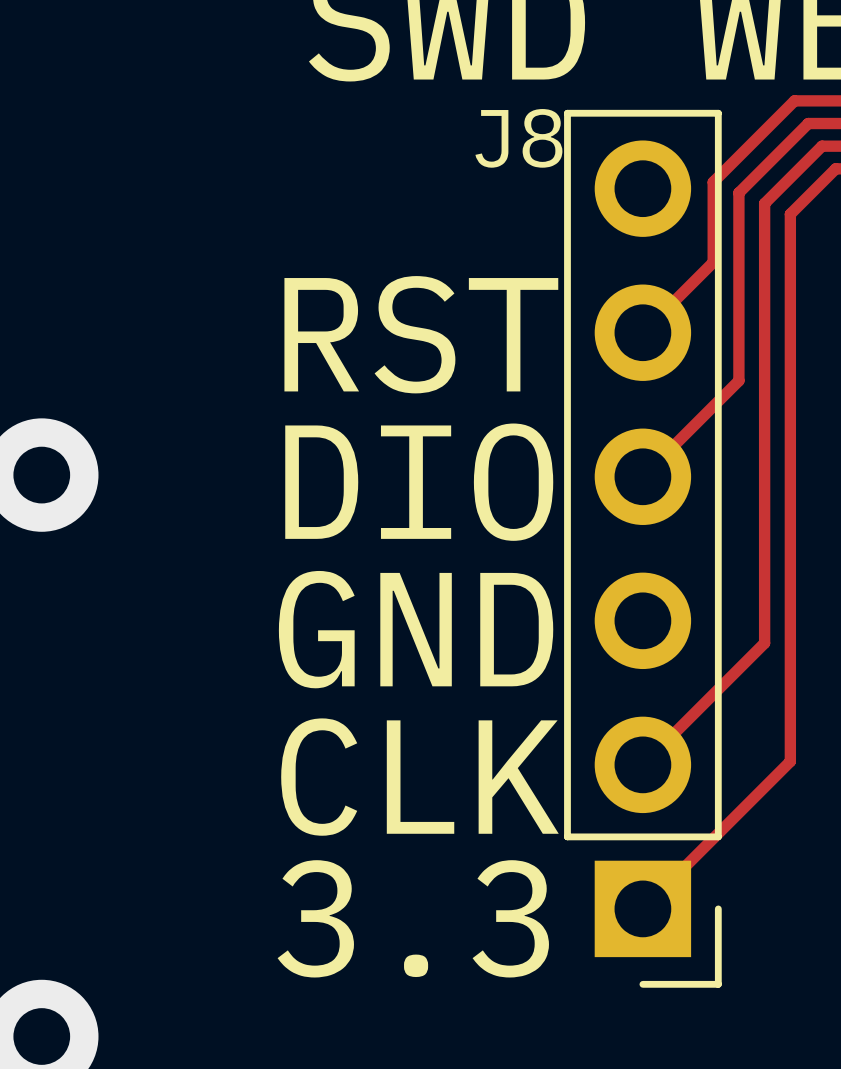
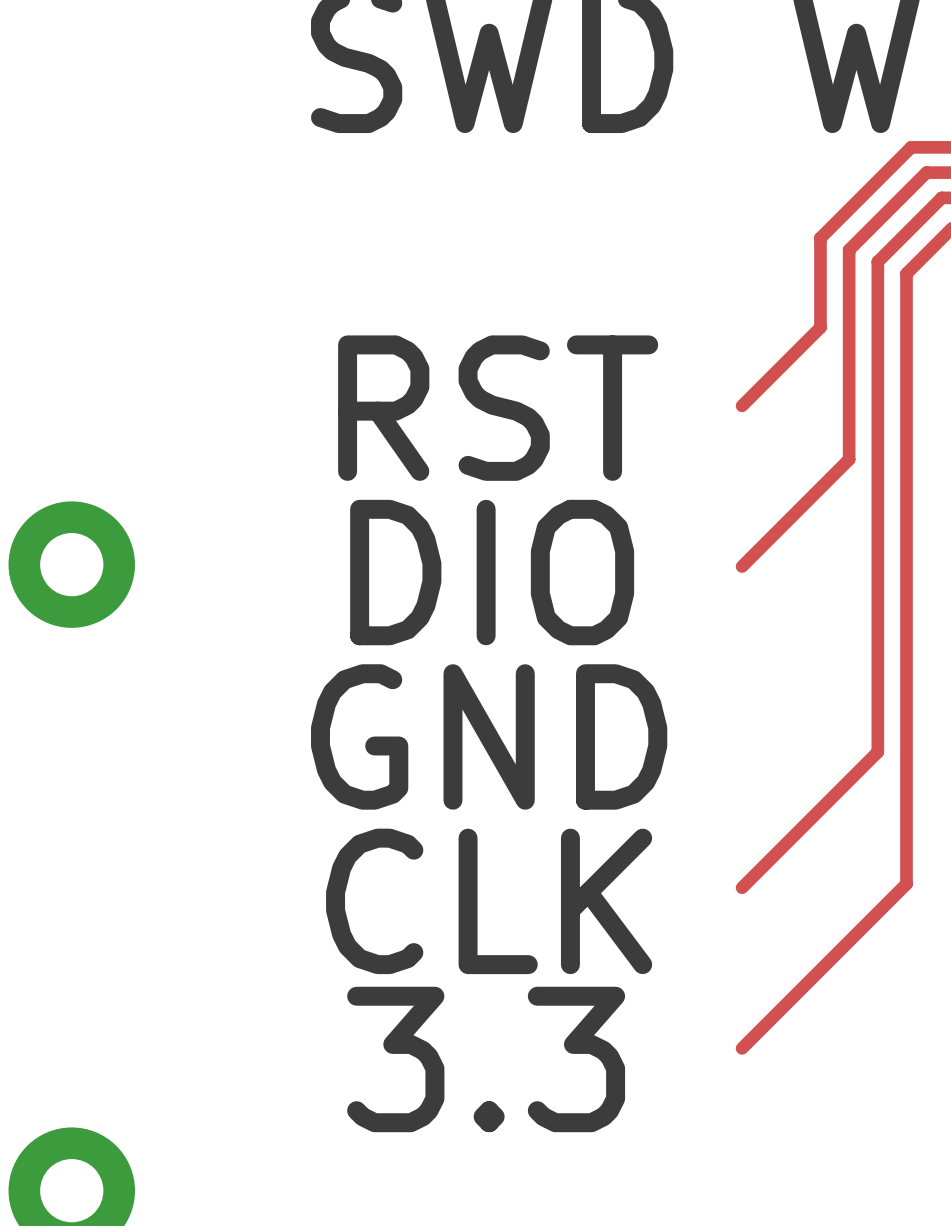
J8: (642, 548) -> none

